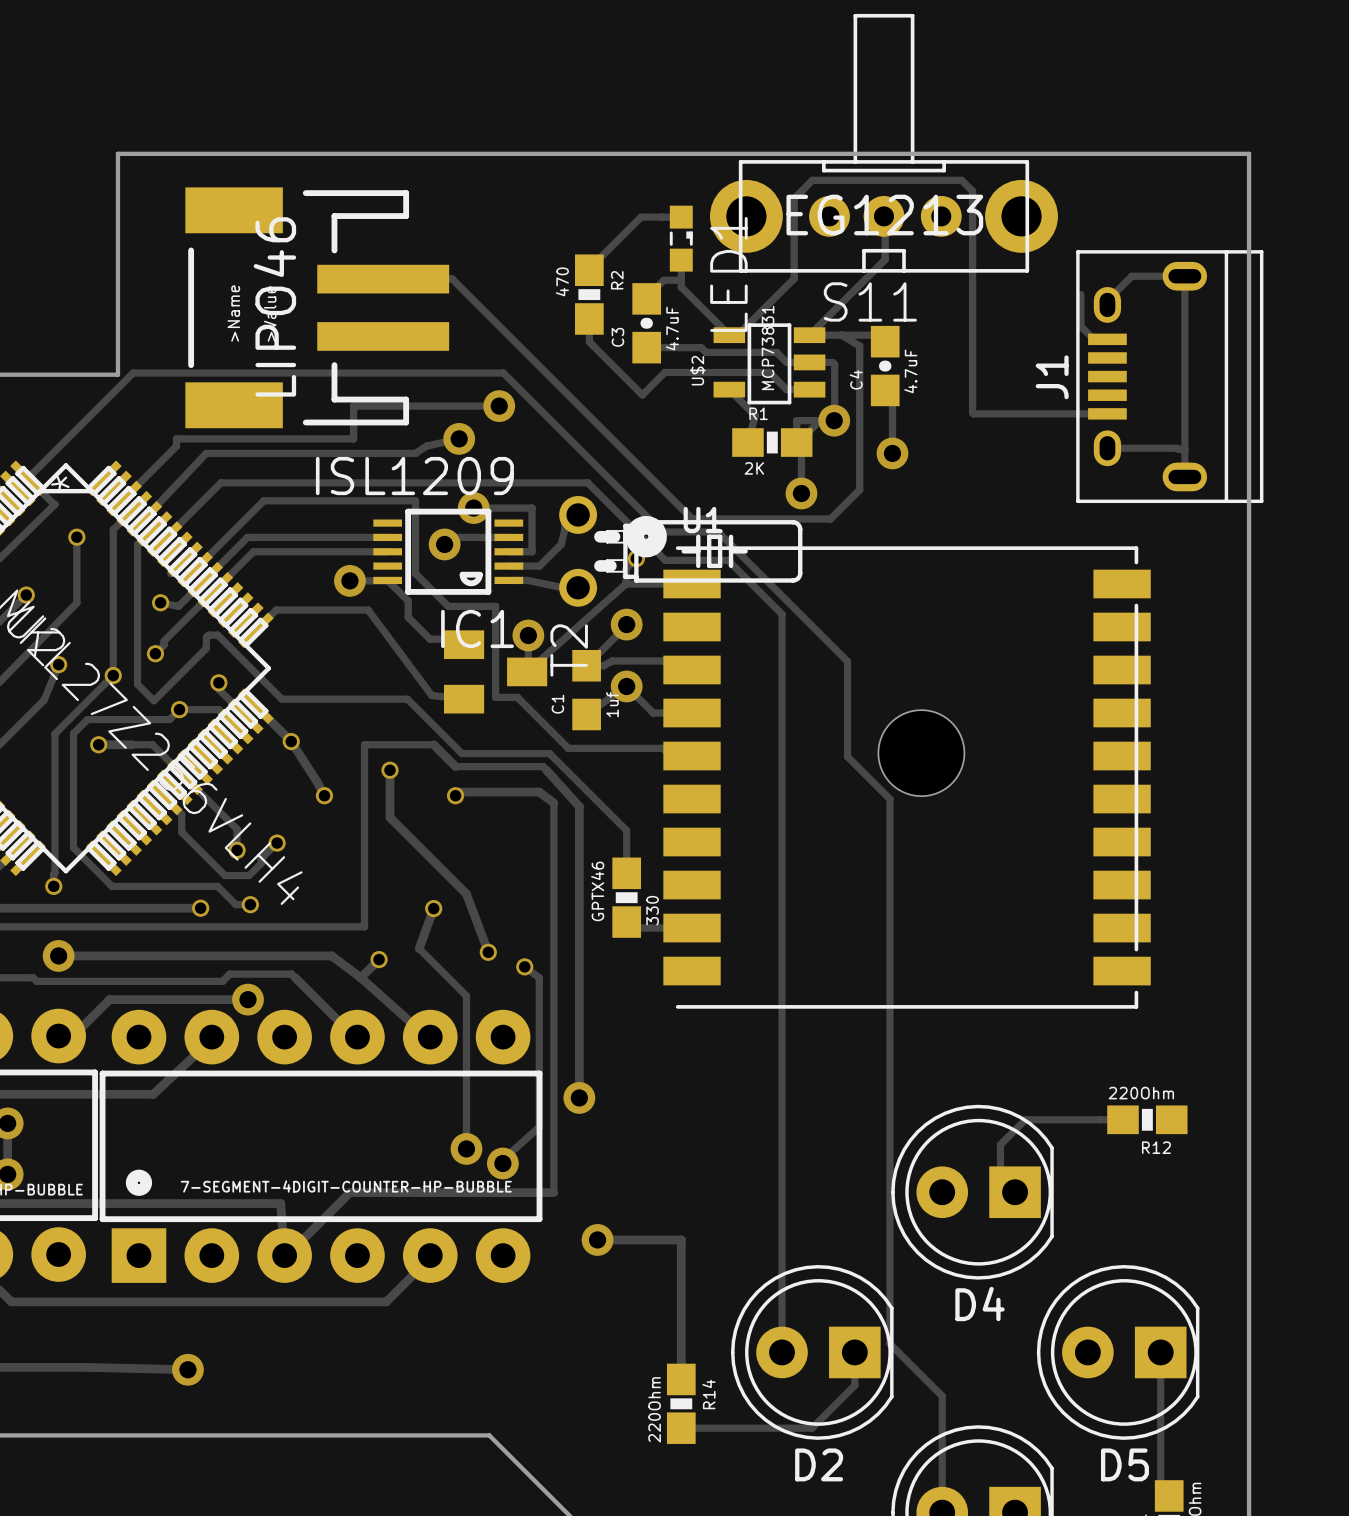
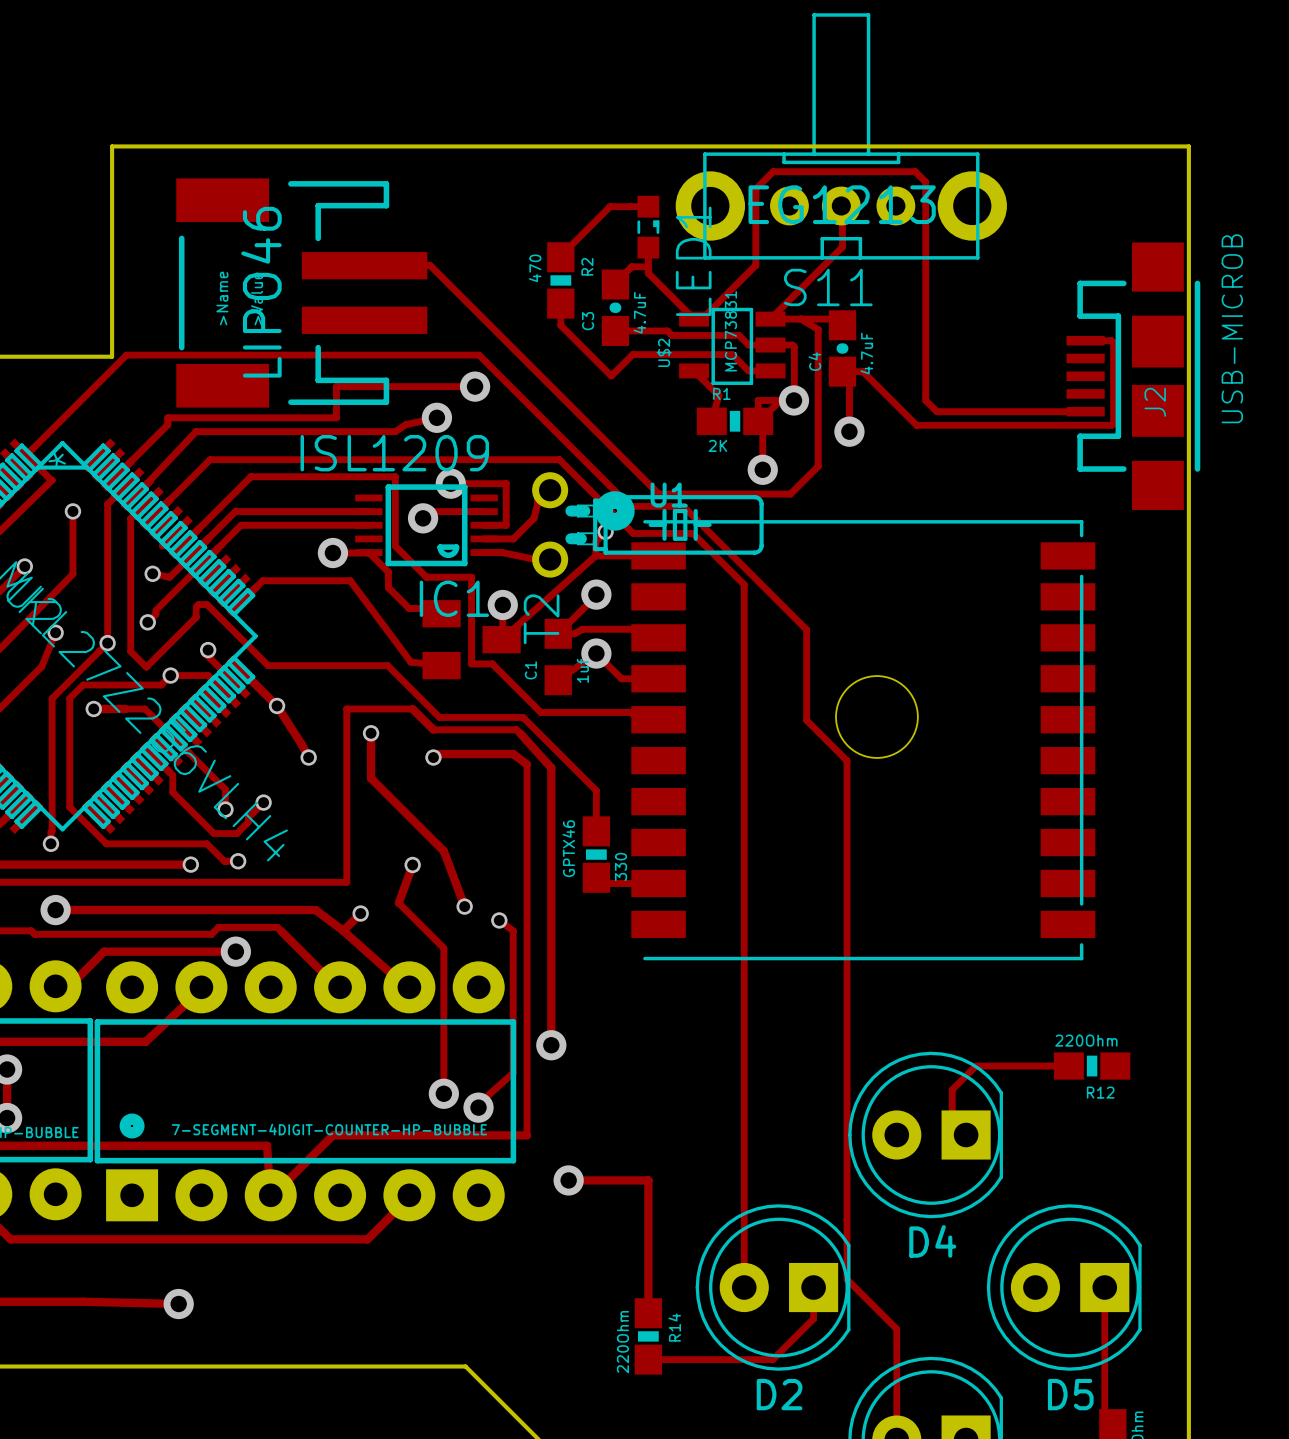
track: (1080, 294) (1080, 326) (1093, 339) (1107, 339) -> none
track: (1107, 304) (1107, 300) (1131, 276) (1184, 276) (1184, 476) -> none
track: none -> (1085, 340) (1111, 340) (1113, 342) (1113, 423) (1111, 425) (916, 425) (862, 371) (842, 371)
J1: (1169, 376) -> none
J2: none -> USB-MICROB (1133, 376)
track: (972, 413) (1107, 413) -> (925, 393) (925, 400) (936, 411) (1085, 411)
track: (1107, 448) (1184, 449) -> none

